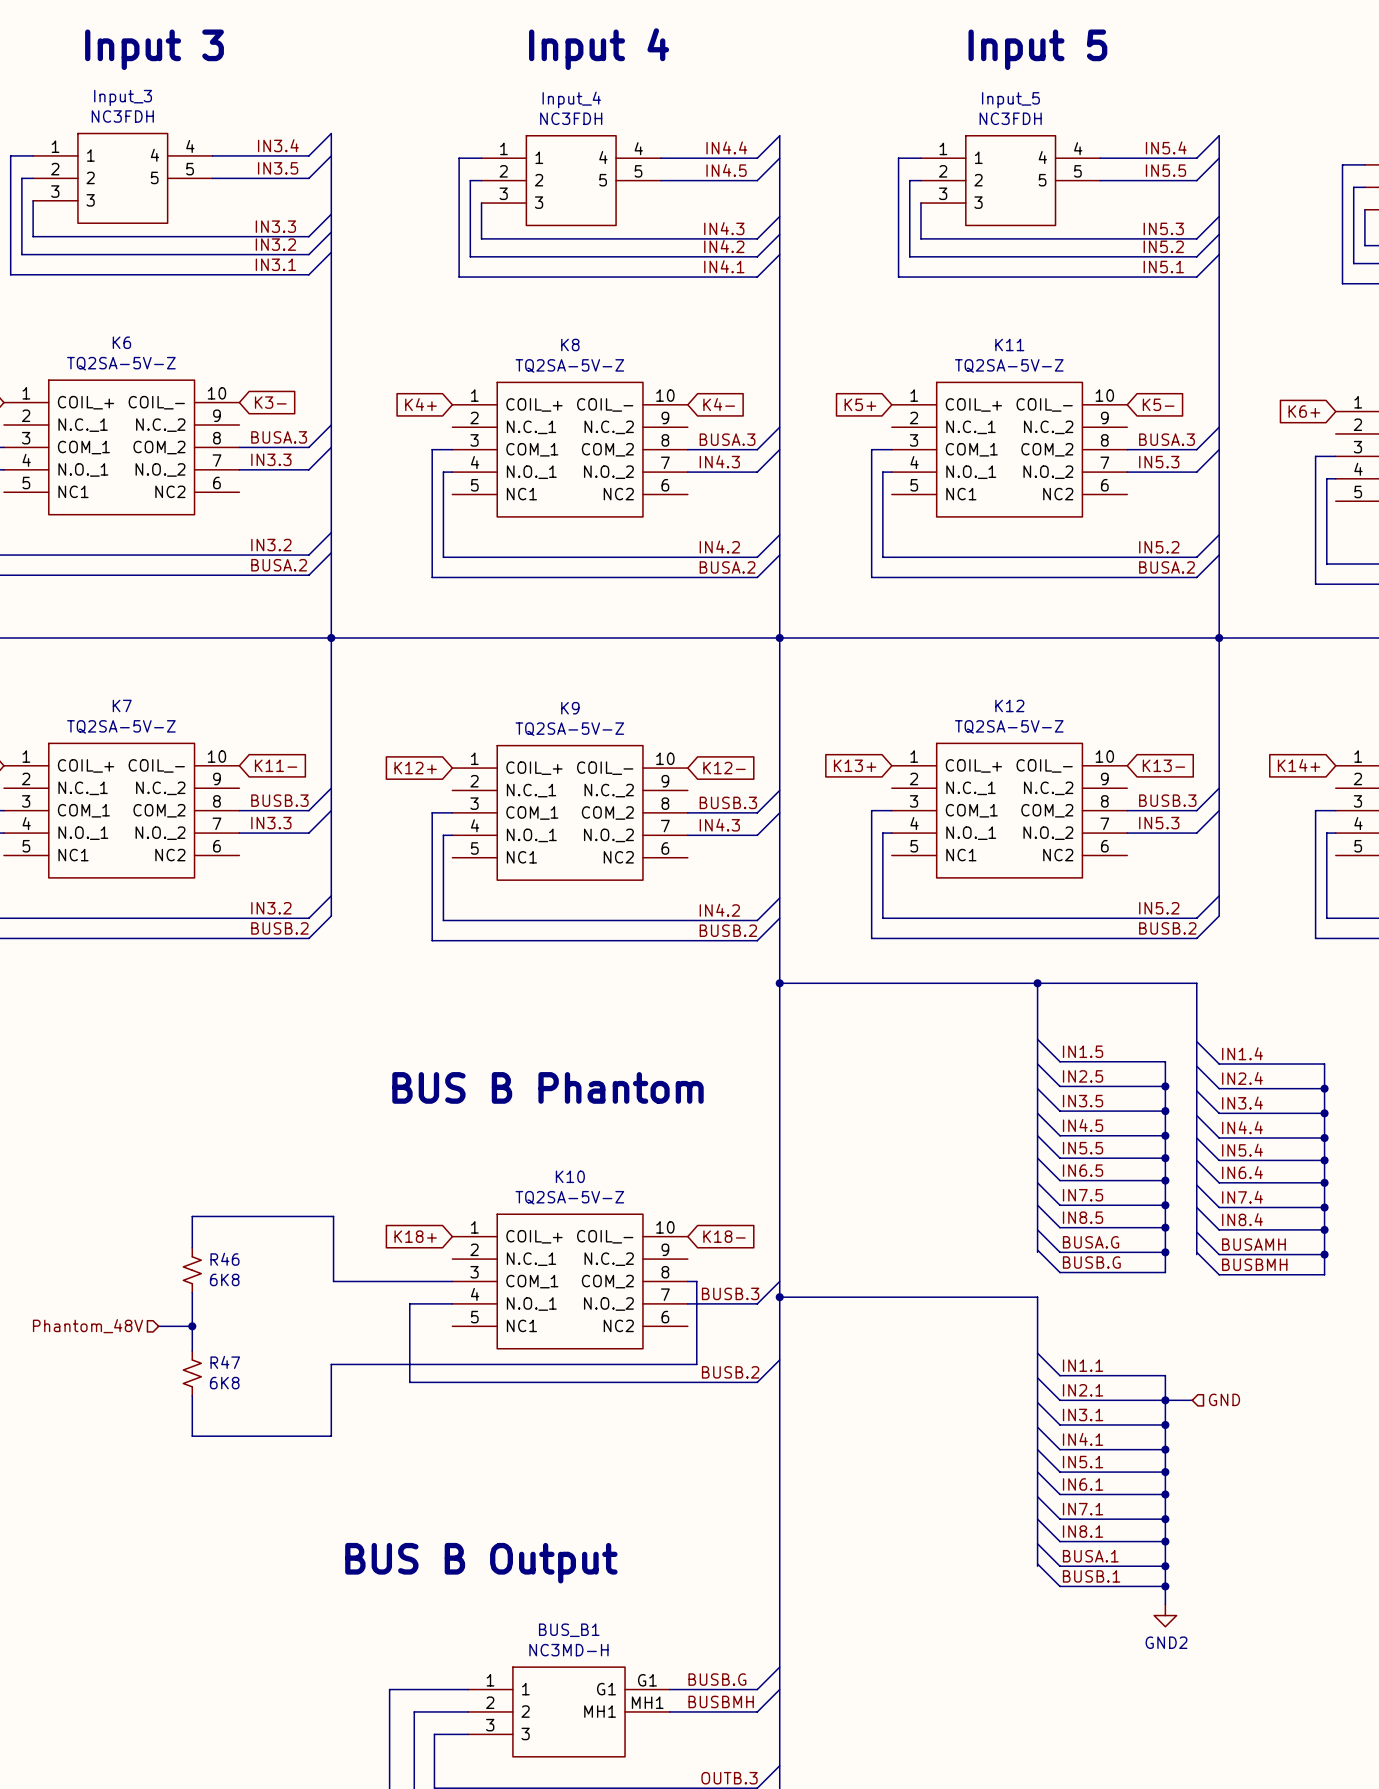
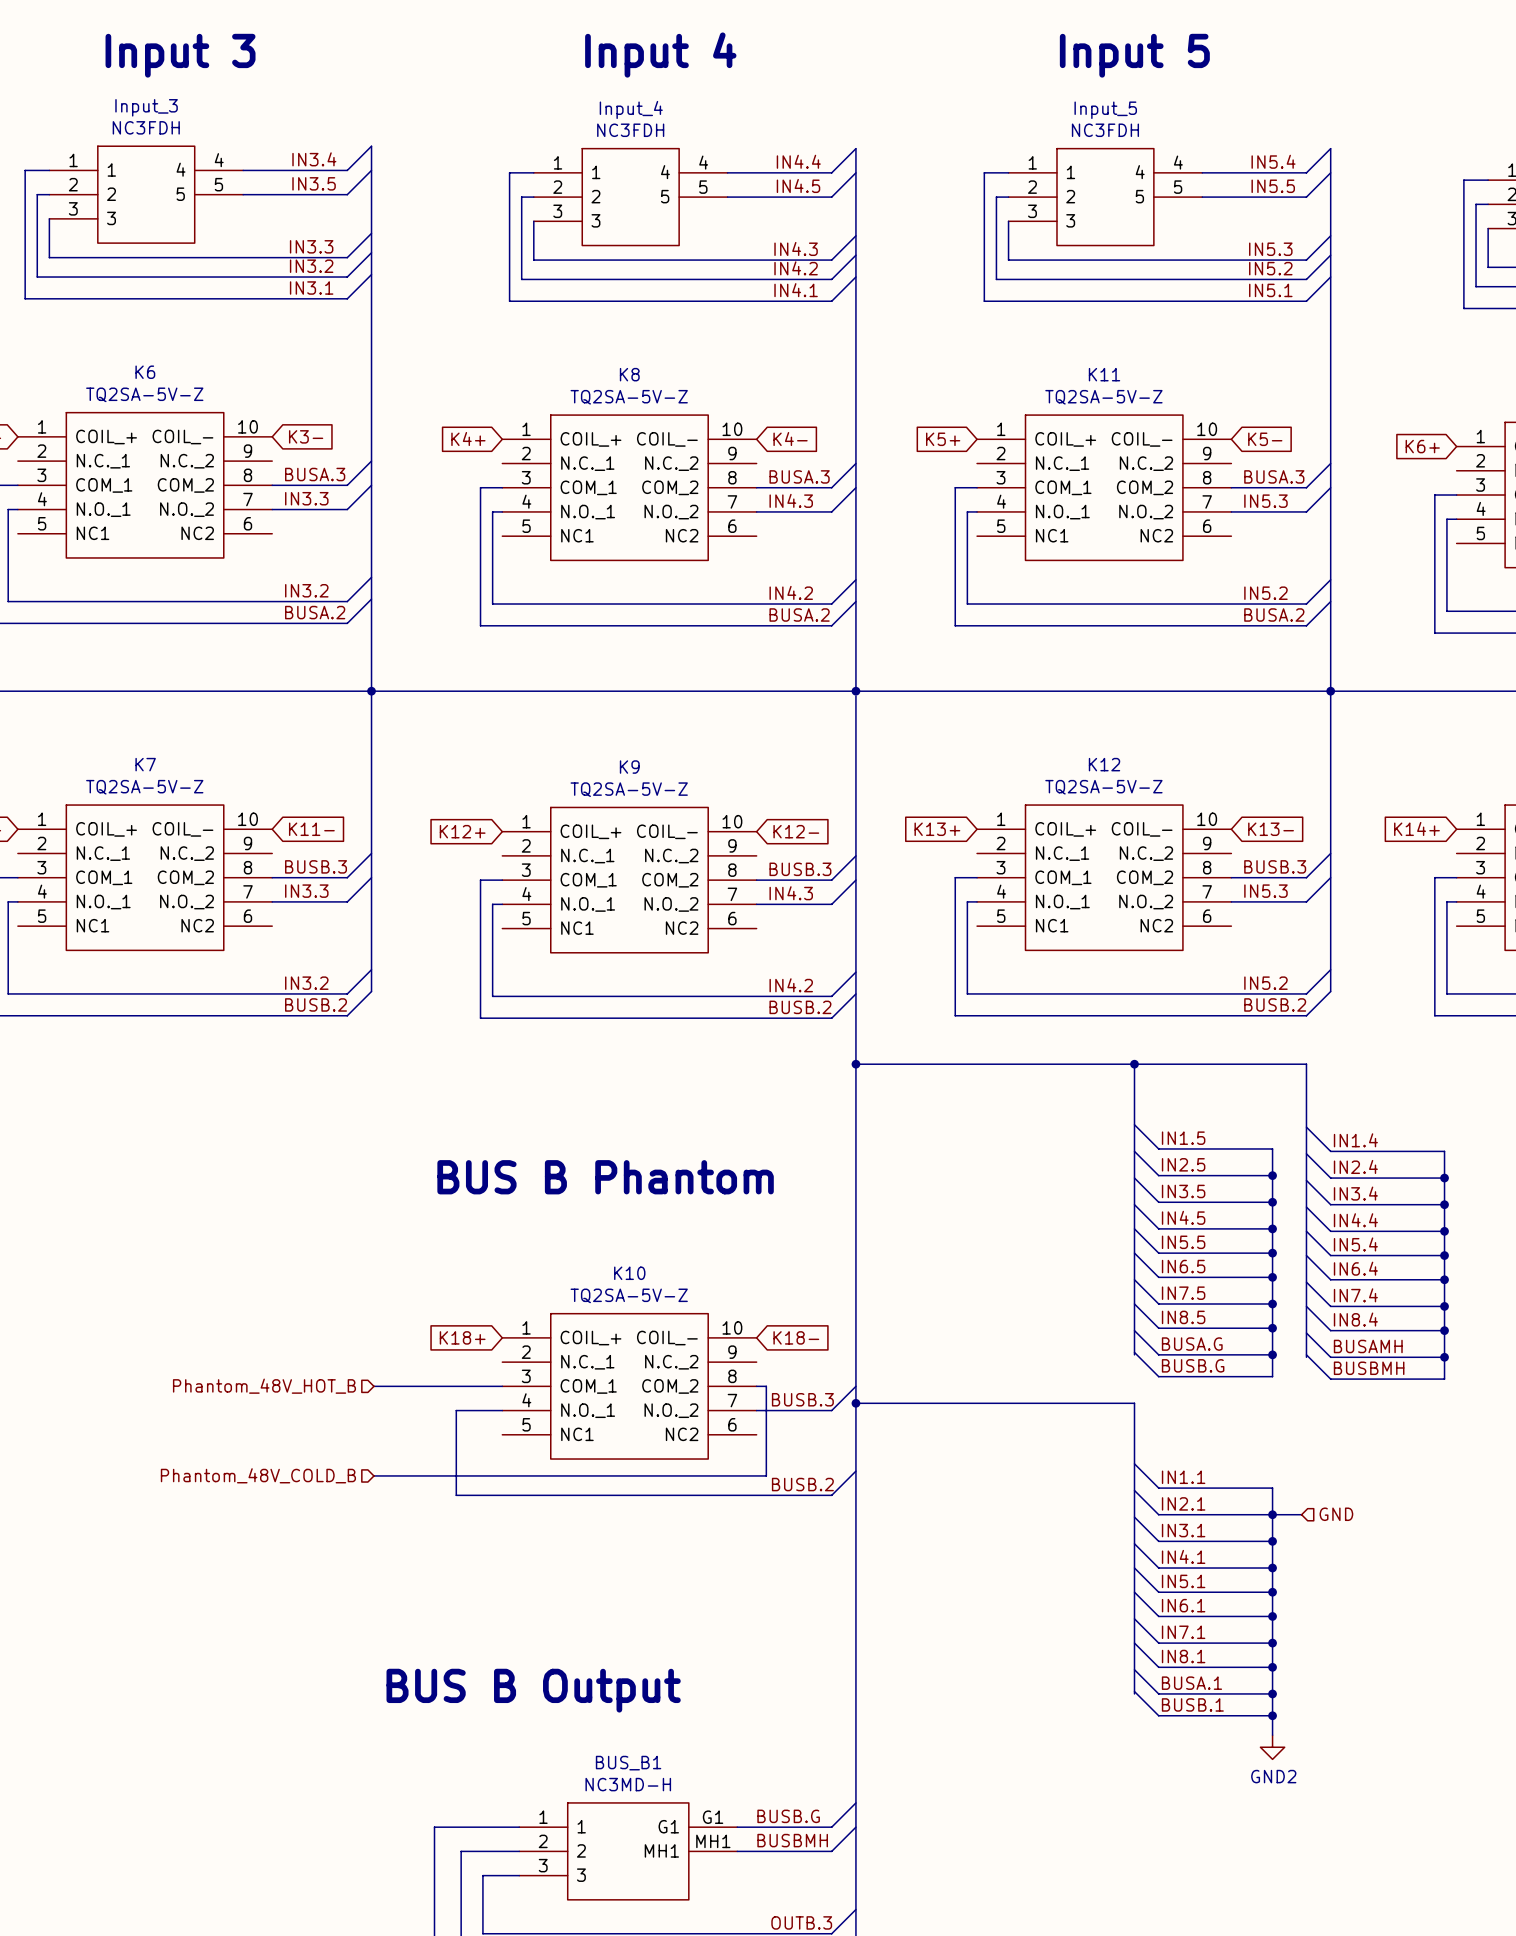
wire: (192, 1247) (192, 1216) (333, 1216) (333, 1281) -> none
R46: 6K8 (192, 1270) -> none
hierarchical label: none -> Phantom_48V_HOT_B (264, 1386)
wire: (192, 1292) (192, 1350) -> none
hierarchical label: Phantom_48V (88, 1326) -> none
wire: (158, 1326) (192, 1326) -> none
junction: (192, 1326) -> none
hierarchical label: none -> Phantom_48V_COLD_B (258, 1475)
wire: (333, 1364) (331, 1364) (331, 1436) (192, 1436) (192, 1395) -> none
R47: 6K8 (192, 1373) -> none

